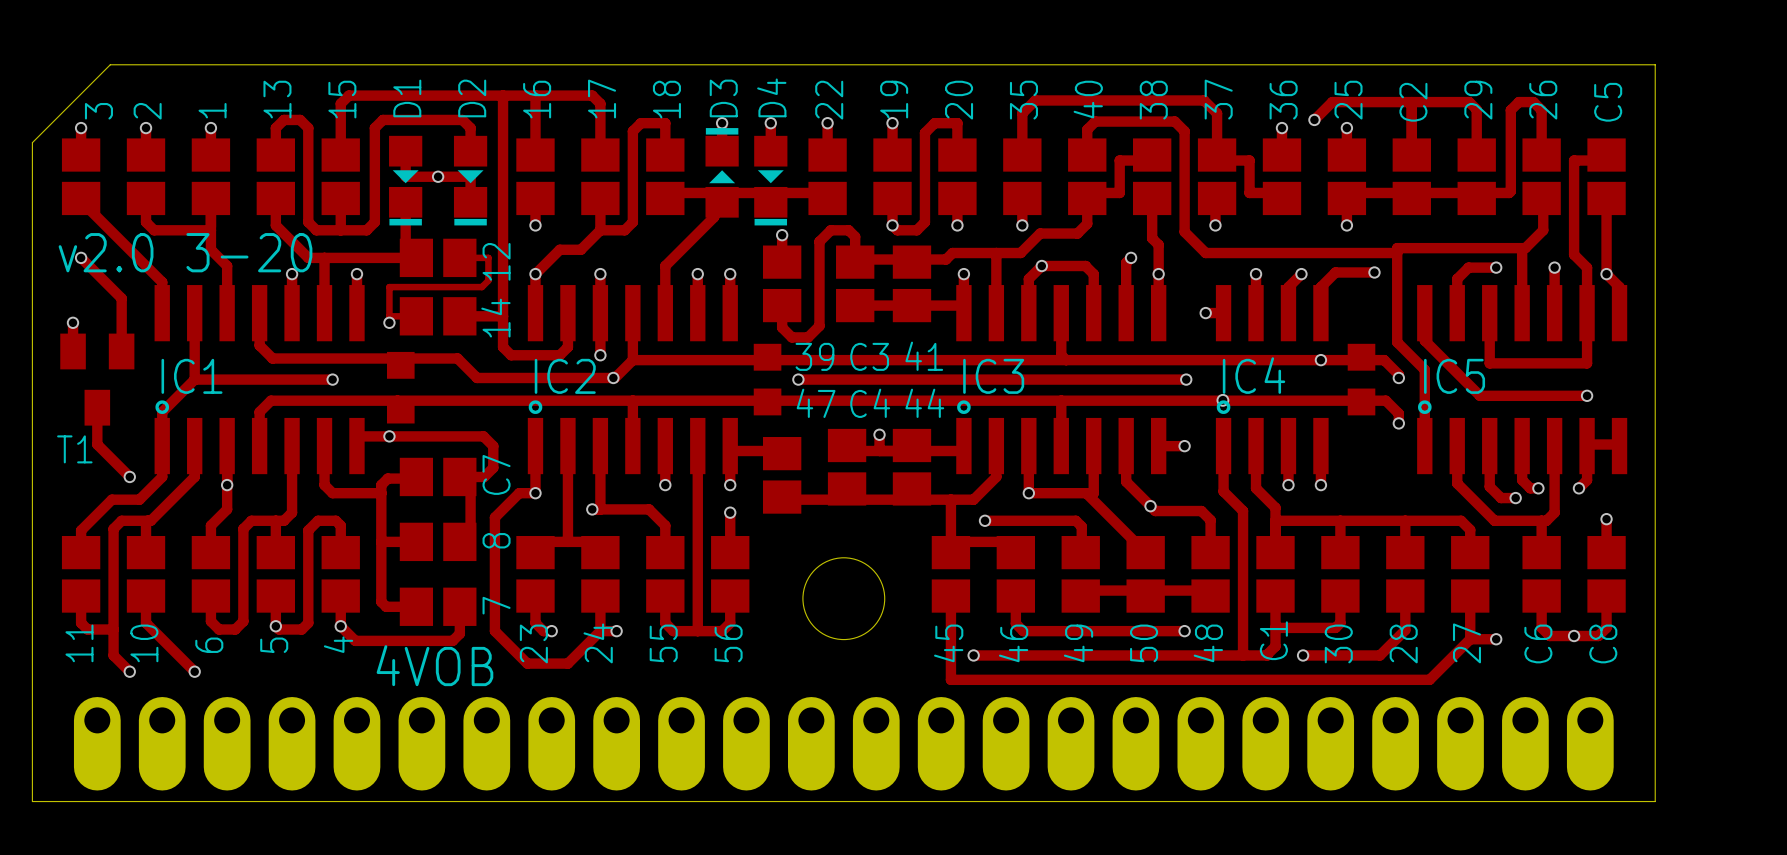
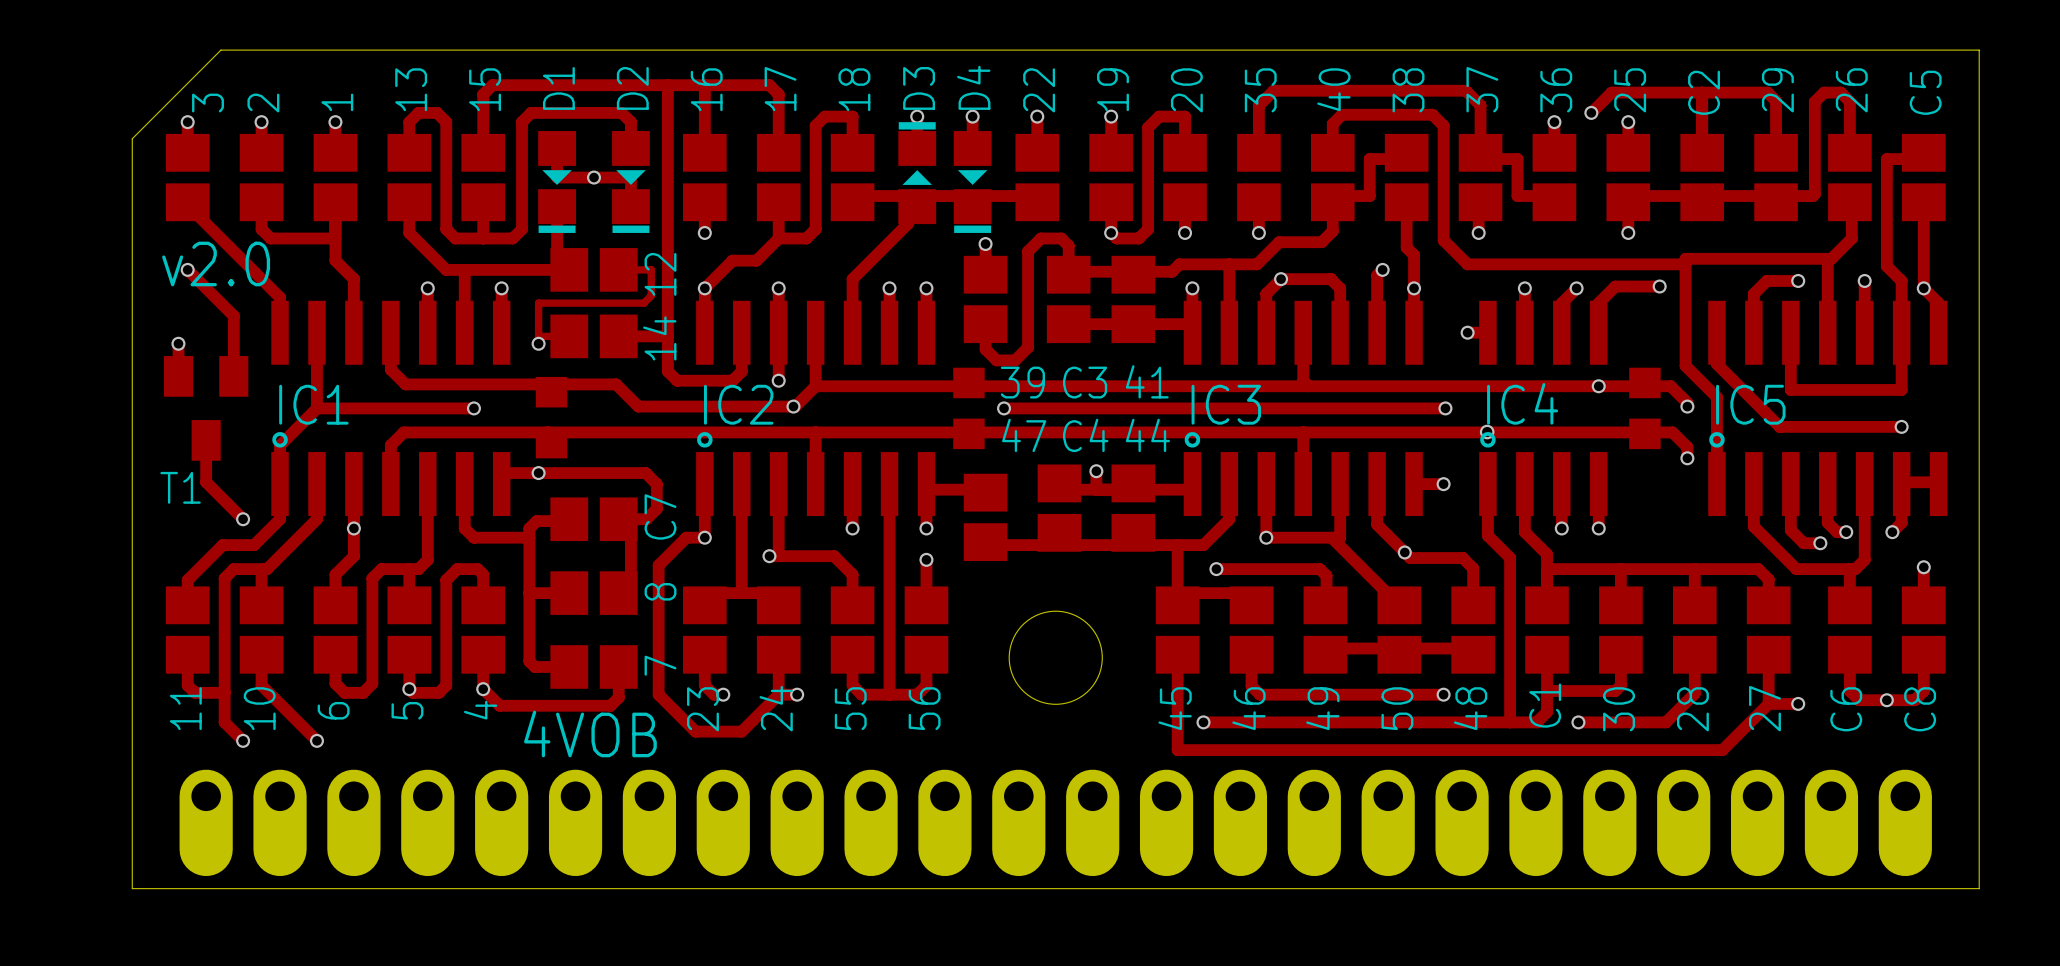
text: v2.0 3-20 (185, 252) -> v2.0 (216, 263)

